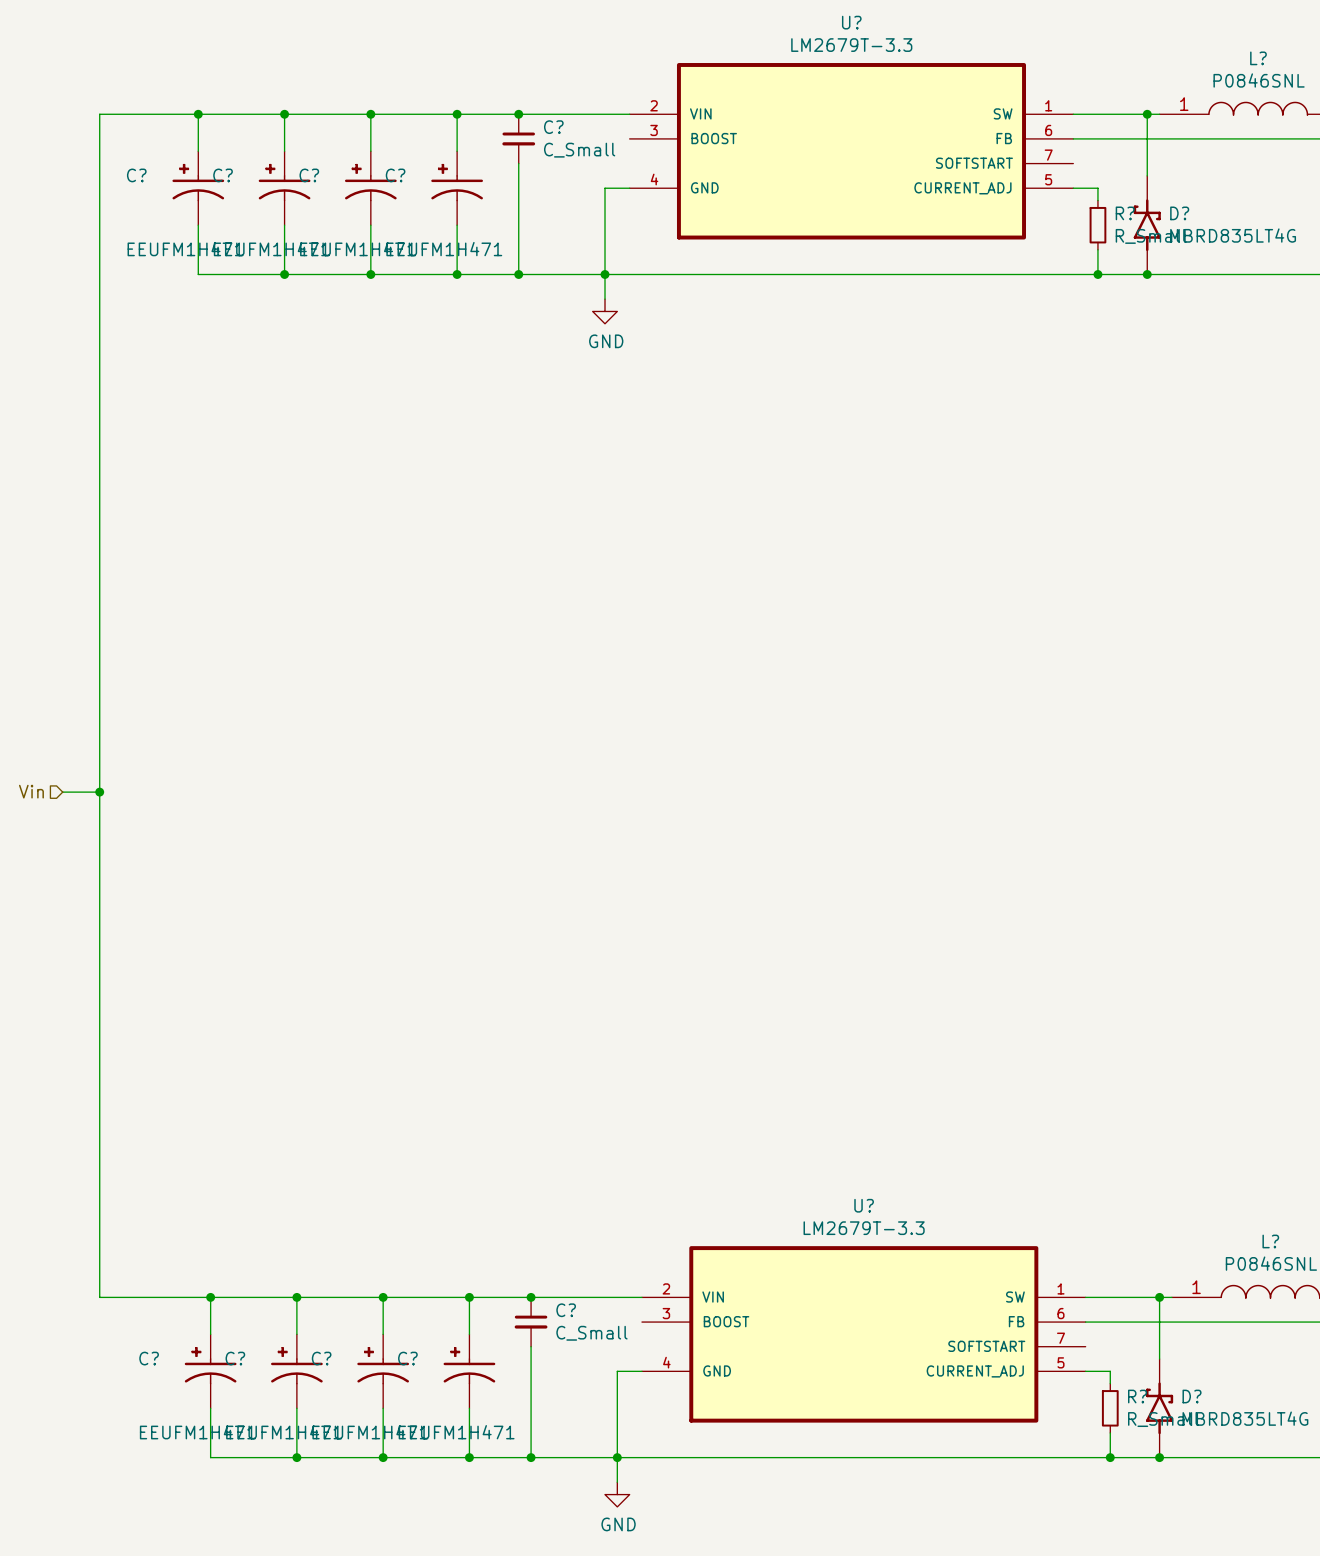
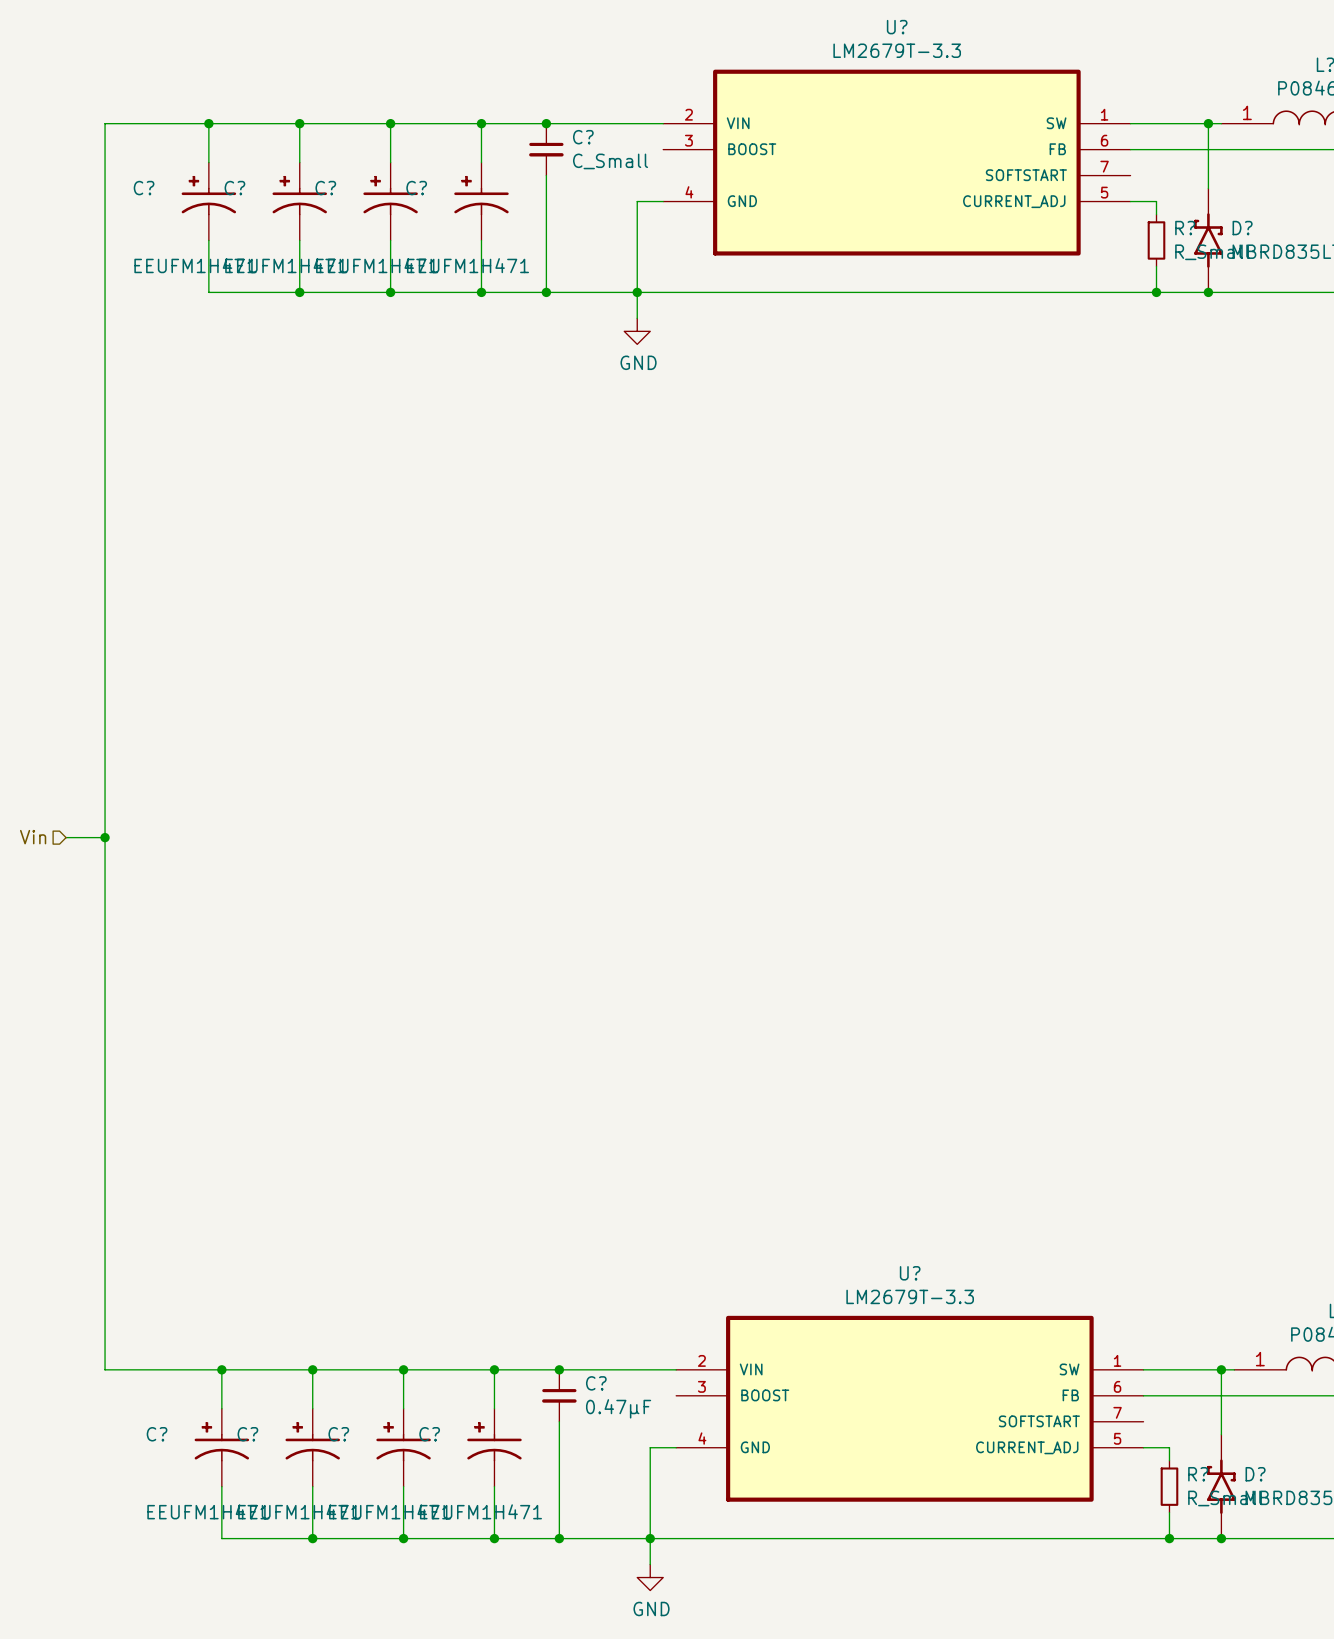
C? value: C_Small (591, 1333) -> 0.47μF (618, 1408)

